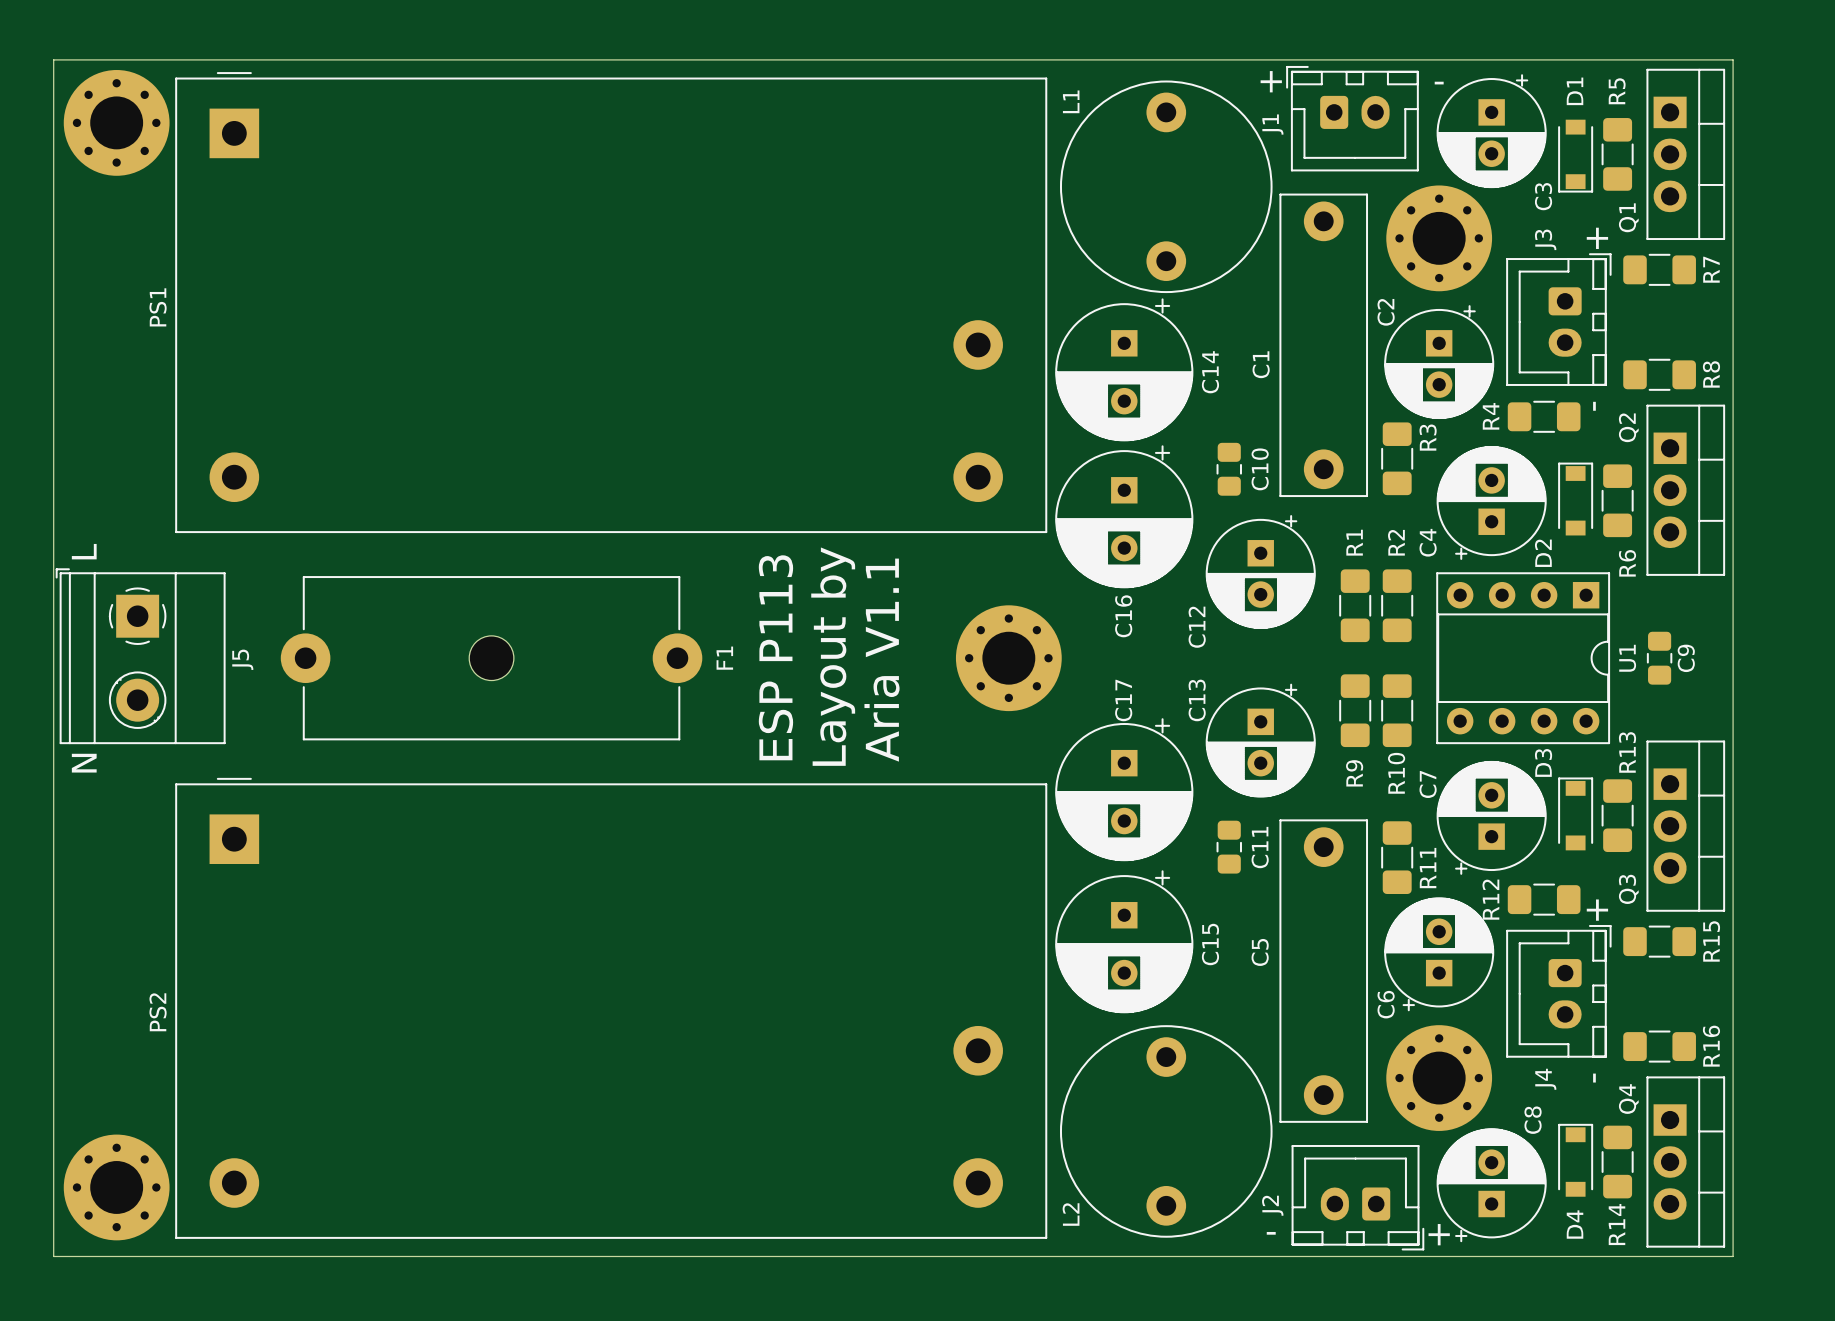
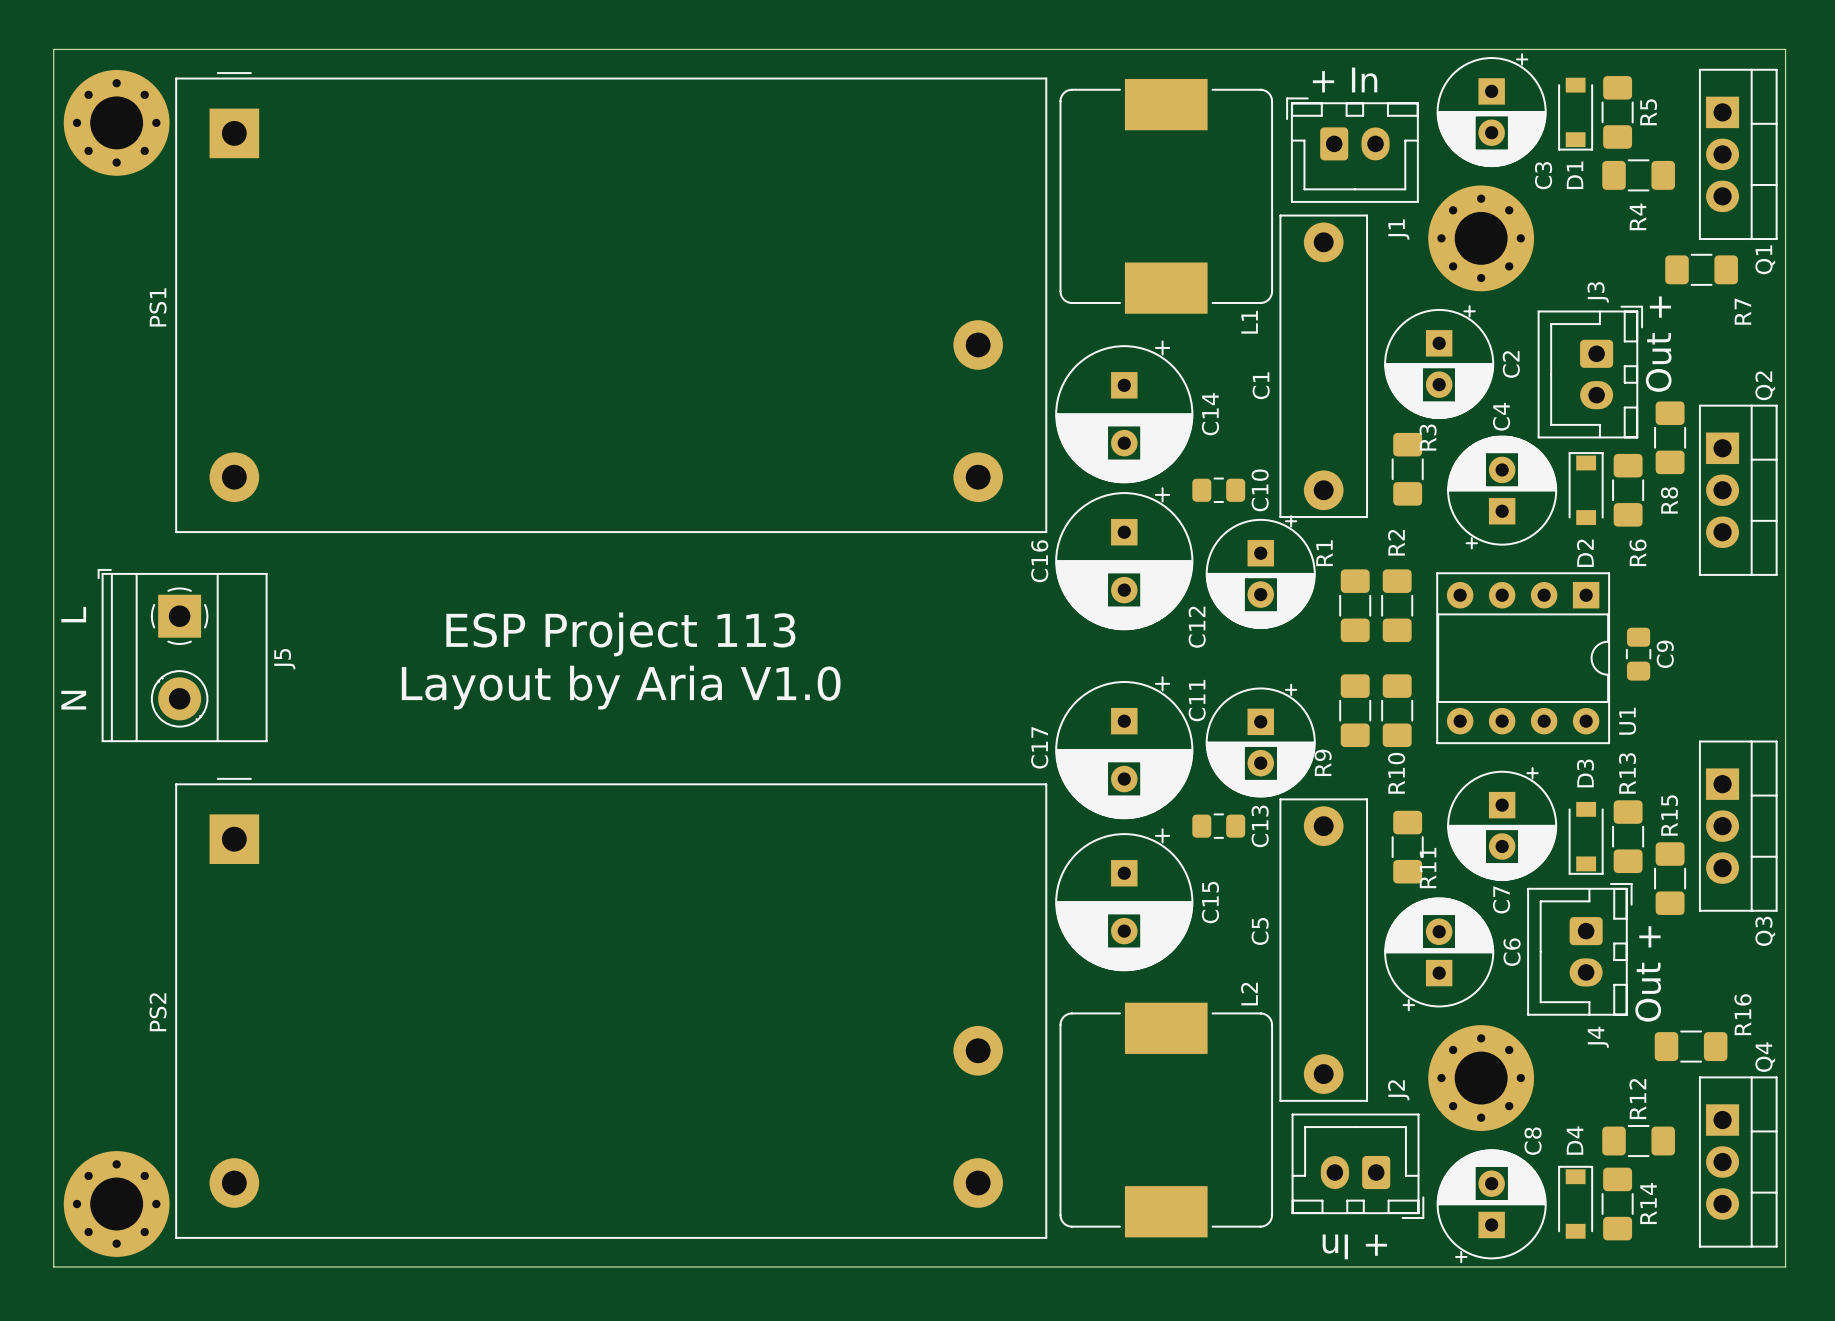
board edge: (53, 59) (1733, 59) (1733, 1256) (53, 1256) -> (53, 59) (53, 49) (1785, 49) (1785, 1266) (53, 1266) (53, 1256)
text: none -> + In (1345, 79)
L1 footprint: [1059, 80, 1273, 294] -> [1059, 79, 1274, 314]
text: + (1271, 81) -> none
text: - (1439, 83) -> none
D1 name position: D1 (1575, 91) -> D1 (1575, 175)
R5 name position: R5 (1617, 91) -> R5 (1648, 112)
L1 name position: L1 (1071, 101) -> L1 (1249, 322)
J1 position: (1352, 118) -> (1352, 150)
J1 name position: J1 (1272, 124) -> J1 (1398, 229)
C3 position: (1491, 131) -> (1491, 110)
R5 position: (1617, 154) -> (1617, 112)
Q1 position: (1685, 154) -> (1738, 154)
D1 position: (1575, 156) -> (1575, 114)
Q1 name position: Q1 (1628, 217) -> Q1 (1765, 259)
part position: (1439, 238) -> (1481, 238)
text: + (1597, 238) -> none
J3 name position: J3 (1545, 239) -> J3 (1598, 292)
R7 position: (1659, 269) -> (1701, 269)
R7 name position: R7 (1711, 269) -> R7 (1742, 311)
C2 name position: C2 (1386, 312) -> C2 (1511, 364)
J3 position: (1558, 319) -> (1590, 372)
text: none -> Out + (1658, 344)
C1 position: (1323, 345) -> (1323, 366)
C14 position: (1124, 369) -> (1124, 411)
R8 rotation: 0° (1659, 374) -> 90° clockwise (1670, 437)
R8 position: (1659, 374) -> (1670, 437)
text: - (1594, 406) -> none
R4 name position: R4 (1491, 416) -> R4 (1637, 216)
R4 position: (1544, 416) -> (1638, 175)
Q2 name position: Q2 (1628, 427) -> Q2 (1765, 385)
R3 position: (1397, 458) -> (1407, 469)
C10 rotation: 0° (1229, 469) -> 90° clockwise (1218, 490)
Q2 position: (1685, 490) -> (1738, 490)
D2 position: (1575, 499) -> (1586, 488)
R6 position: (1617, 500) -> (1628, 490)
C4 position: (1491, 502) -> (1502, 492)
C16 position: (1124, 516) -> (1124, 558)
R1 name position: R1 (1354, 542) -> R1 (1324, 553)
C4 name position: C4 (1428, 542) -> C4 (1501, 416)
text position: L (84, 551) -> L (73, 614)
D2 name position: D2 (1543, 553) -> D2 (1585, 553)
J5 footprint: [55, 568, 226, 745] -> [97, 568, 268, 743]
C16 name position: C16 (1123, 616) -> C16 (1039, 561)
text: Layout by (833, 656) -> Layout by Aria V1.0 (621, 687)
text: ESP P113 (775, 657) -> ESP Project 113 (620, 634)
F1: (491, 658) -> none
part: (1008, 658) -> none
U1 name position: U1 (1627, 658) -> U1 (1627, 721)
C9 position: (1659, 658) -> (1638, 654)
text: Aria V1.1 (882, 660) -> none
C17 name position: C17 (1123, 700) -> C17 (1039, 747)
C13 name position: C13 (1197, 700) -> C13 (1260, 826)
R13 name position: R13 (1627, 752) -> R13 (1627, 773)
D3 name position: D3 (1543, 762) -> D3 (1585, 773)
text position: N (84, 763) -> N (73, 700)
R9 name position: R9 (1354, 773) -> R9 (1323, 762)
C7 name position: C7 (1428, 784) -> C7 (1501, 899)
C17 position: (1124, 789) -> (1124, 747)
D3 rotation: 0° (1575, 813) -> 180° (1586, 838)
R13 position: (1617, 815) -> (1628, 836)
C7 rotation: 0° (1491, 817) -> 180° (1502, 823)
Q3 position: (1685, 826) -> (1738, 826)
C11 rotation: 0° (1229, 847) -> 90° clockwise (1218, 826)
C11 name position: C11 (1260, 847) -> C11 (1197, 700)
R11 position: (1397, 857) -> (1407, 847)
Q3 name position: Q3 (1628, 889) -> Q3 (1765, 931)
R12 name position: R12 (1490, 899) -> R12 (1637, 1099)
R12 position: (1544, 899) -> (1638, 1141)
text: + (1597, 910) -> none
C15 position: (1124, 941) -> (1124, 899)
R15 rotation: 0° (1659, 941) -> 90° clockwise (1670, 878)
R15 position: (1659, 941) -> (1670, 878)
R15 name position: R15 (1711, 941) -> R15 (1669, 815)
C5 position: (1323, 971) -> (1323, 950)
text: none -> Out + (1648, 973)
J4 position: (1558, 991) -> (1579, 949)
C6 name position: C6 (1386, 1004) -> C6 (1512, 952)
L2 footprint: [1059, 1025, 1273, 1238] -> [1059, 1002, 1274, 1238]
R16 position: (1659, 1046) -> (1691, 1046)
R16 name position: R16 (1711, 1046) -> R16 (1742, 1014)
part position: (1439, 1078) -> (1481, 1078)
text: - (1594, 1078) -> none
J4 name position: J4 (1545, 1079) -> J4 (1598, 1037)
Q4 name position: Q4 (1628, 1099) -> Q4 (1765, 1057)
D4 position: (1575, 1160) -> (1575, 1202)
R14 position: (1617, 1162) -> (1617, 1204)
Q4 position: (1685, 1162) -> (1738, 1162)
C8 position: (1491, 1185) -> (1491, 1206)
part position: (116, 1187) -> (116, 1204)
J2 position: (1357, 1197) -> (1357, 1166)
J2 name position: J2 (1272, 1205) -> J2 (1398, 1090)
L2 name position: L2 (1071, 1214) -> L2 (1249, 994)
D4 name position: D4 (1575, 1224) -> D4 (1575, 1140)
R14 name position: R14 (1616, 1224) -> R14 (1648, 1203)
text: - (1271, 1233) -> none
text: + (1439, 1234) -> none
text: none -> + In (1354, 1246)

